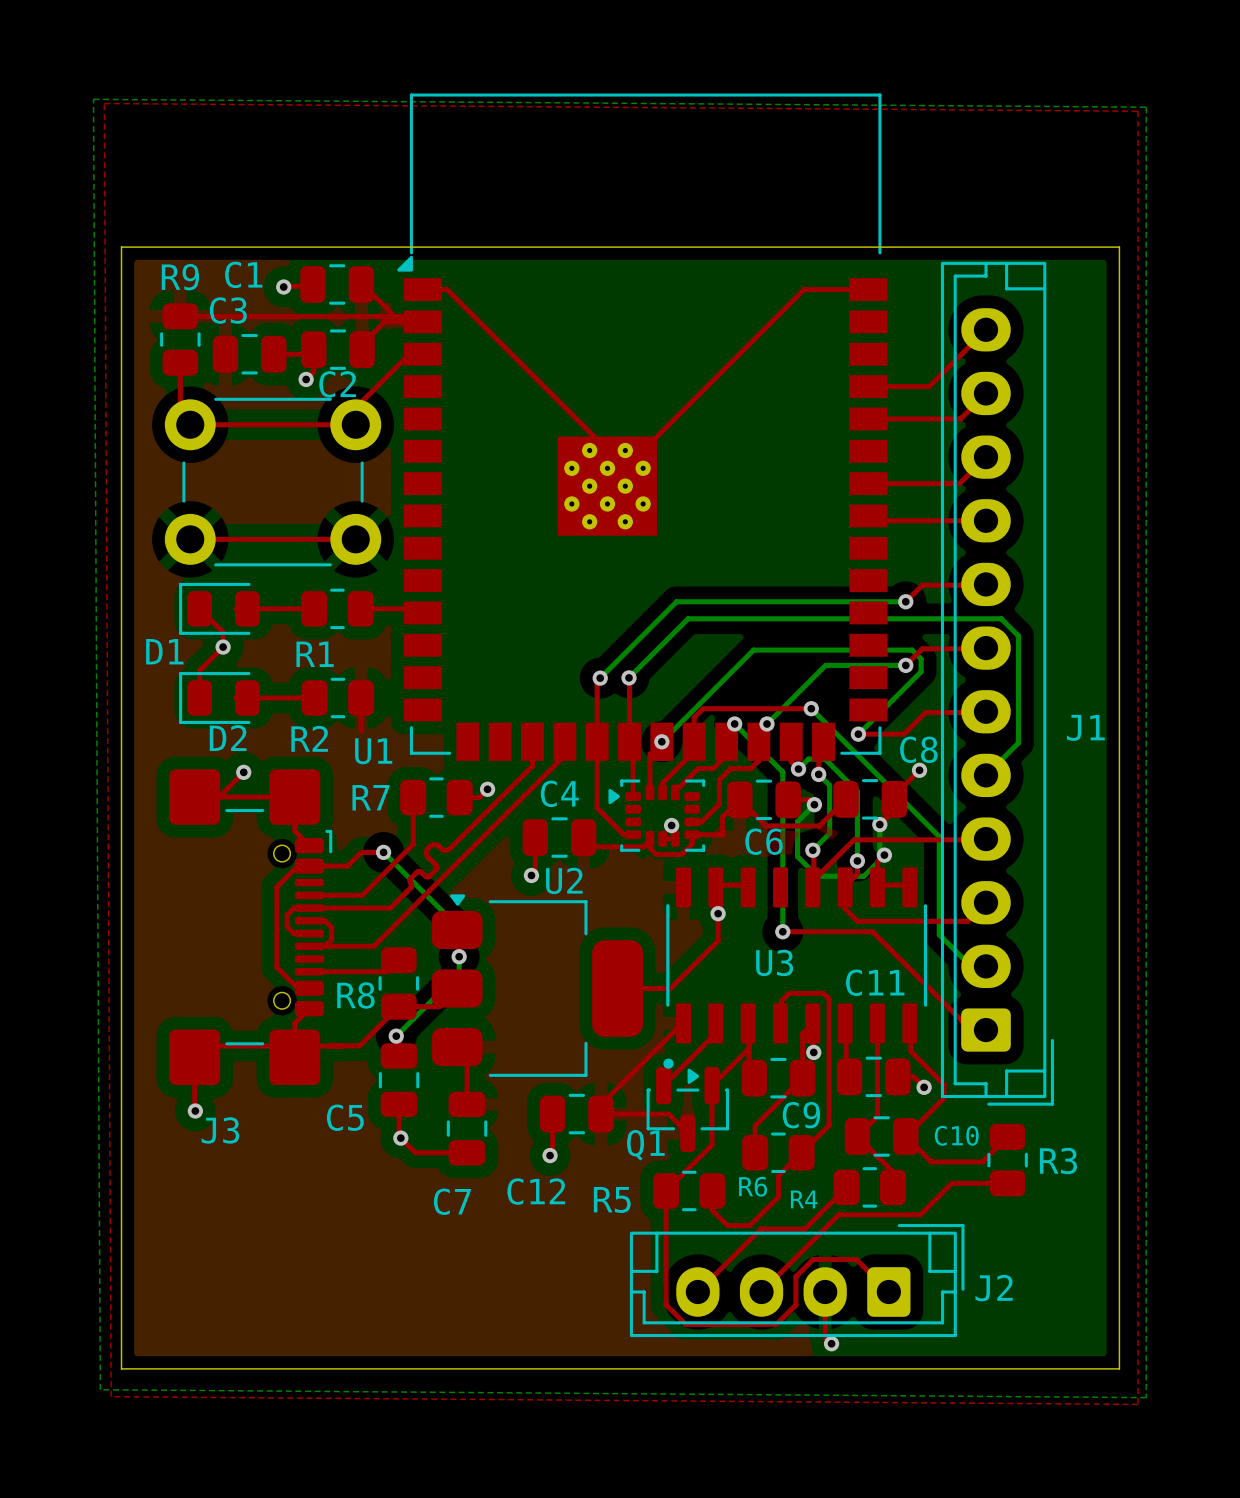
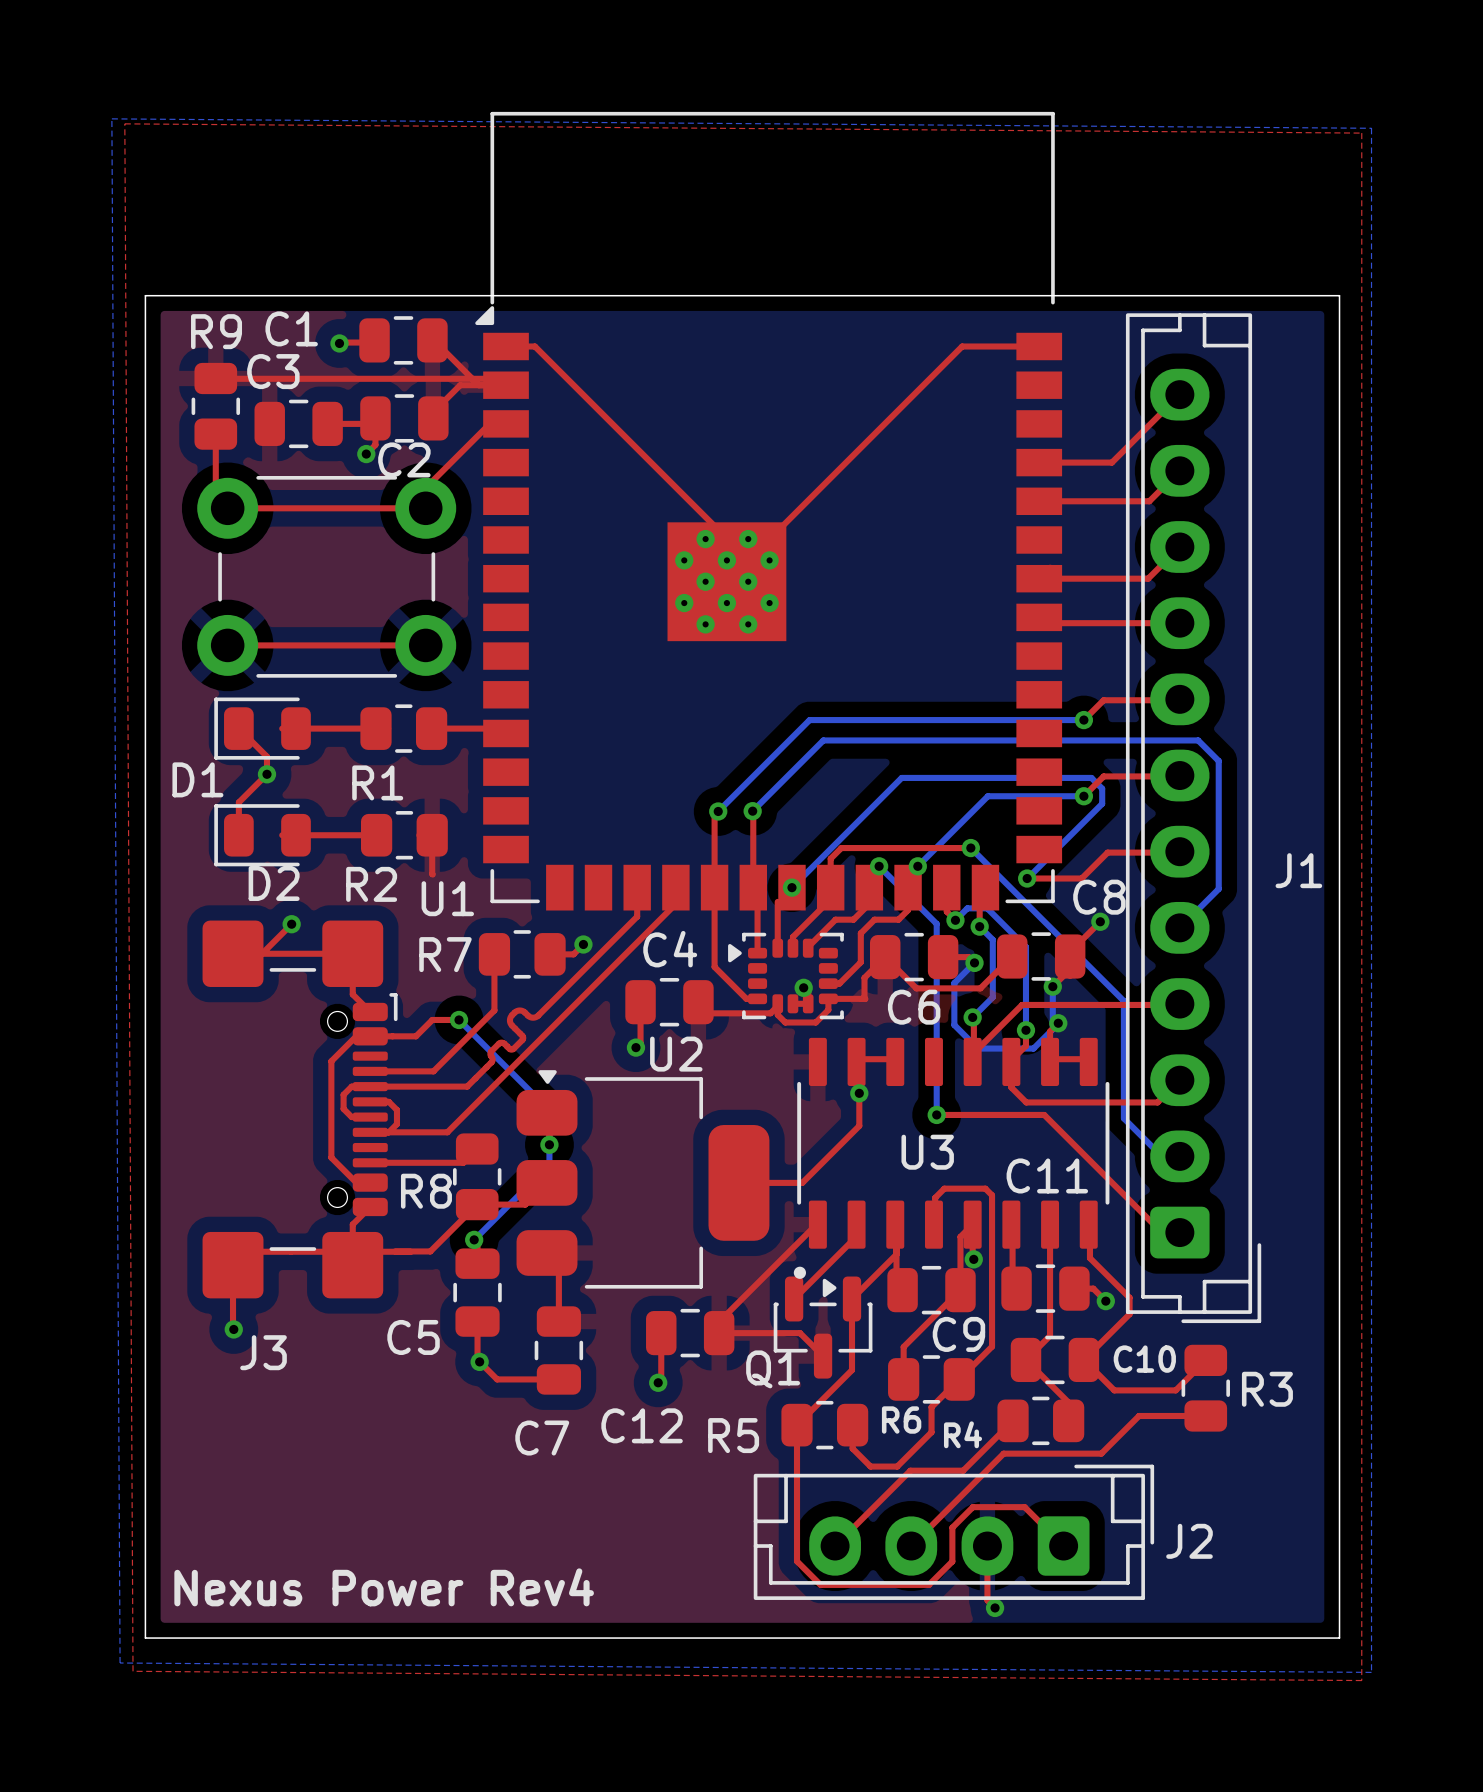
text: none -> Nexus Power Rev4 (384, 1587)

